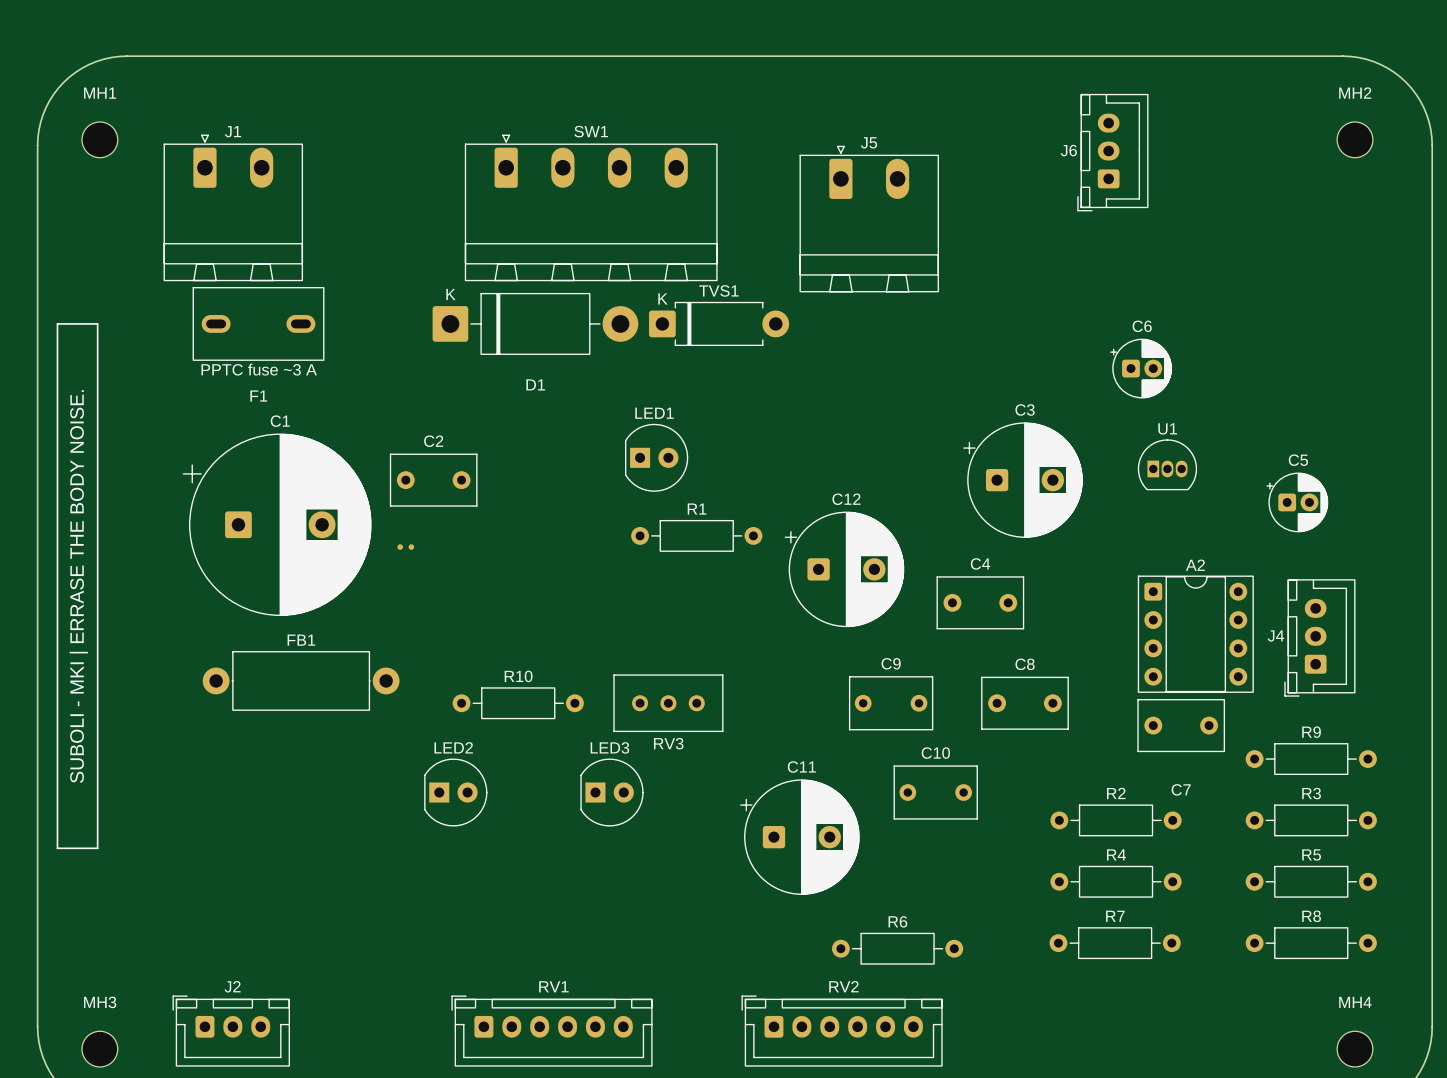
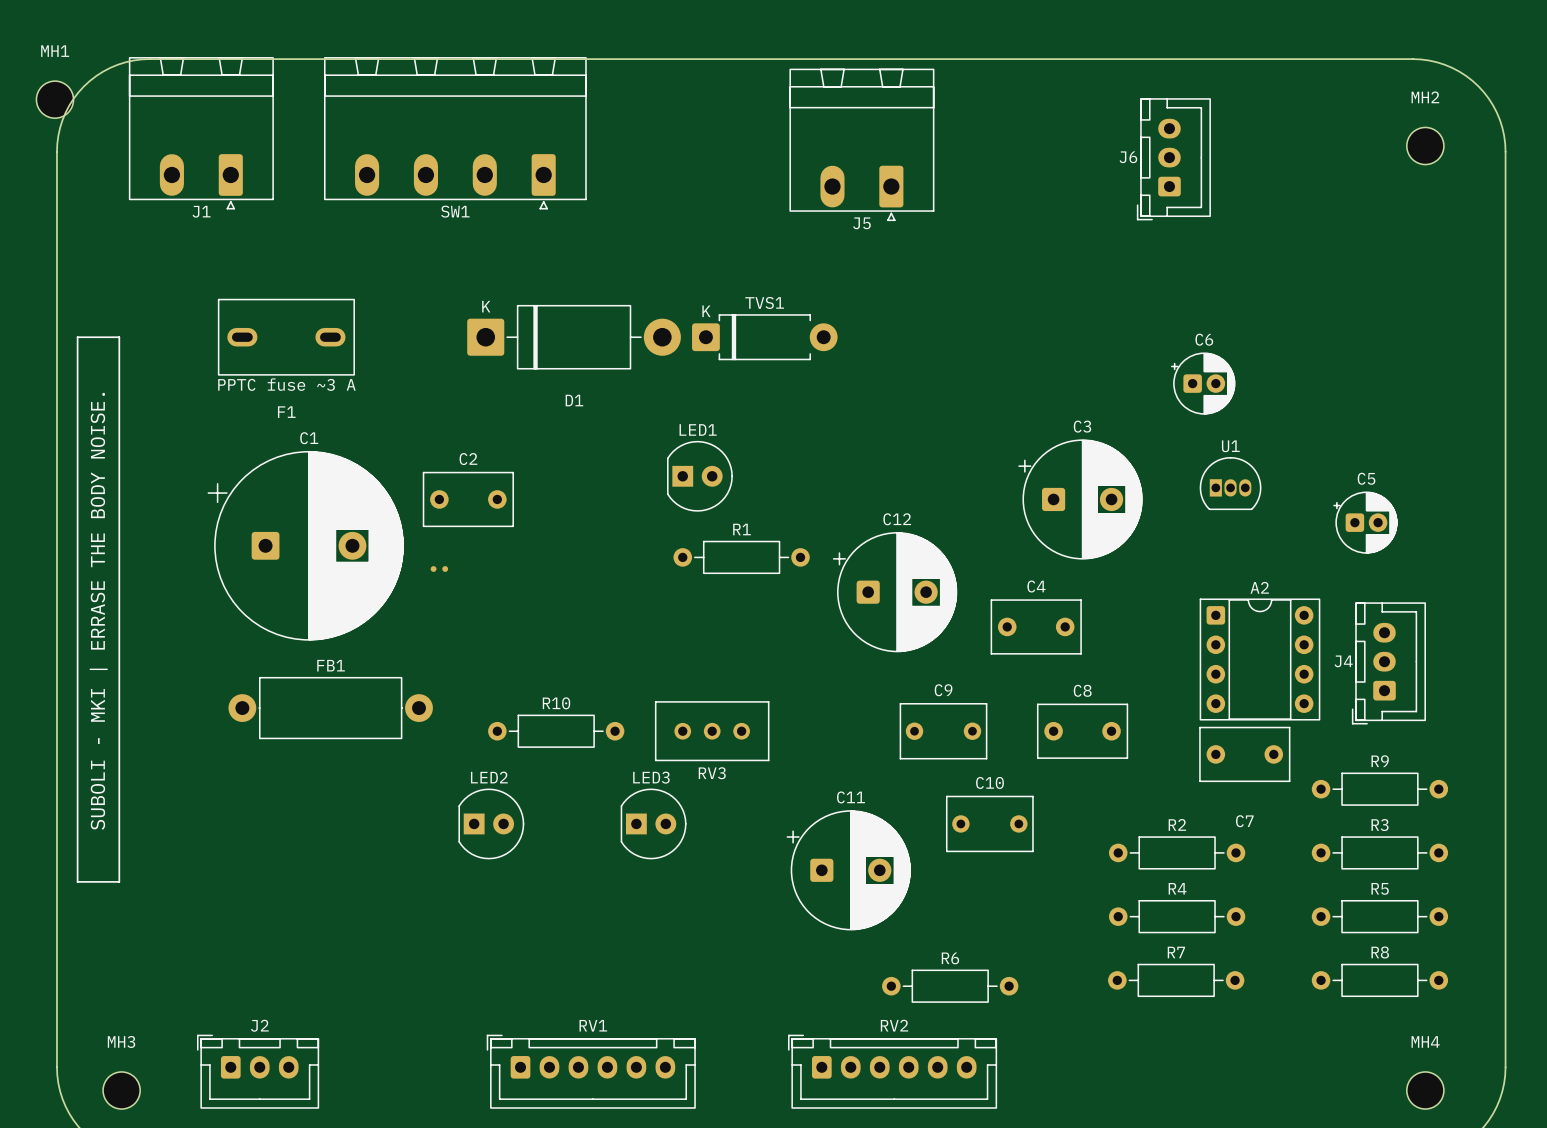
MH1 position: (99, 139) -> (54, 99)
J1 rotation: 0° (233, 207) -> 180° (201, 133)
J1 position: (233, 207) -> (201, 133)
SW1 rotation: 0° (591, 207) -> 180° (455, 133)
SW1 position: (591, 207) -> (455, 133)
J5 rotation: 0° (869, 219) -> 180° (861, 144)
J5 position: (869, 219) -> (861, 144)

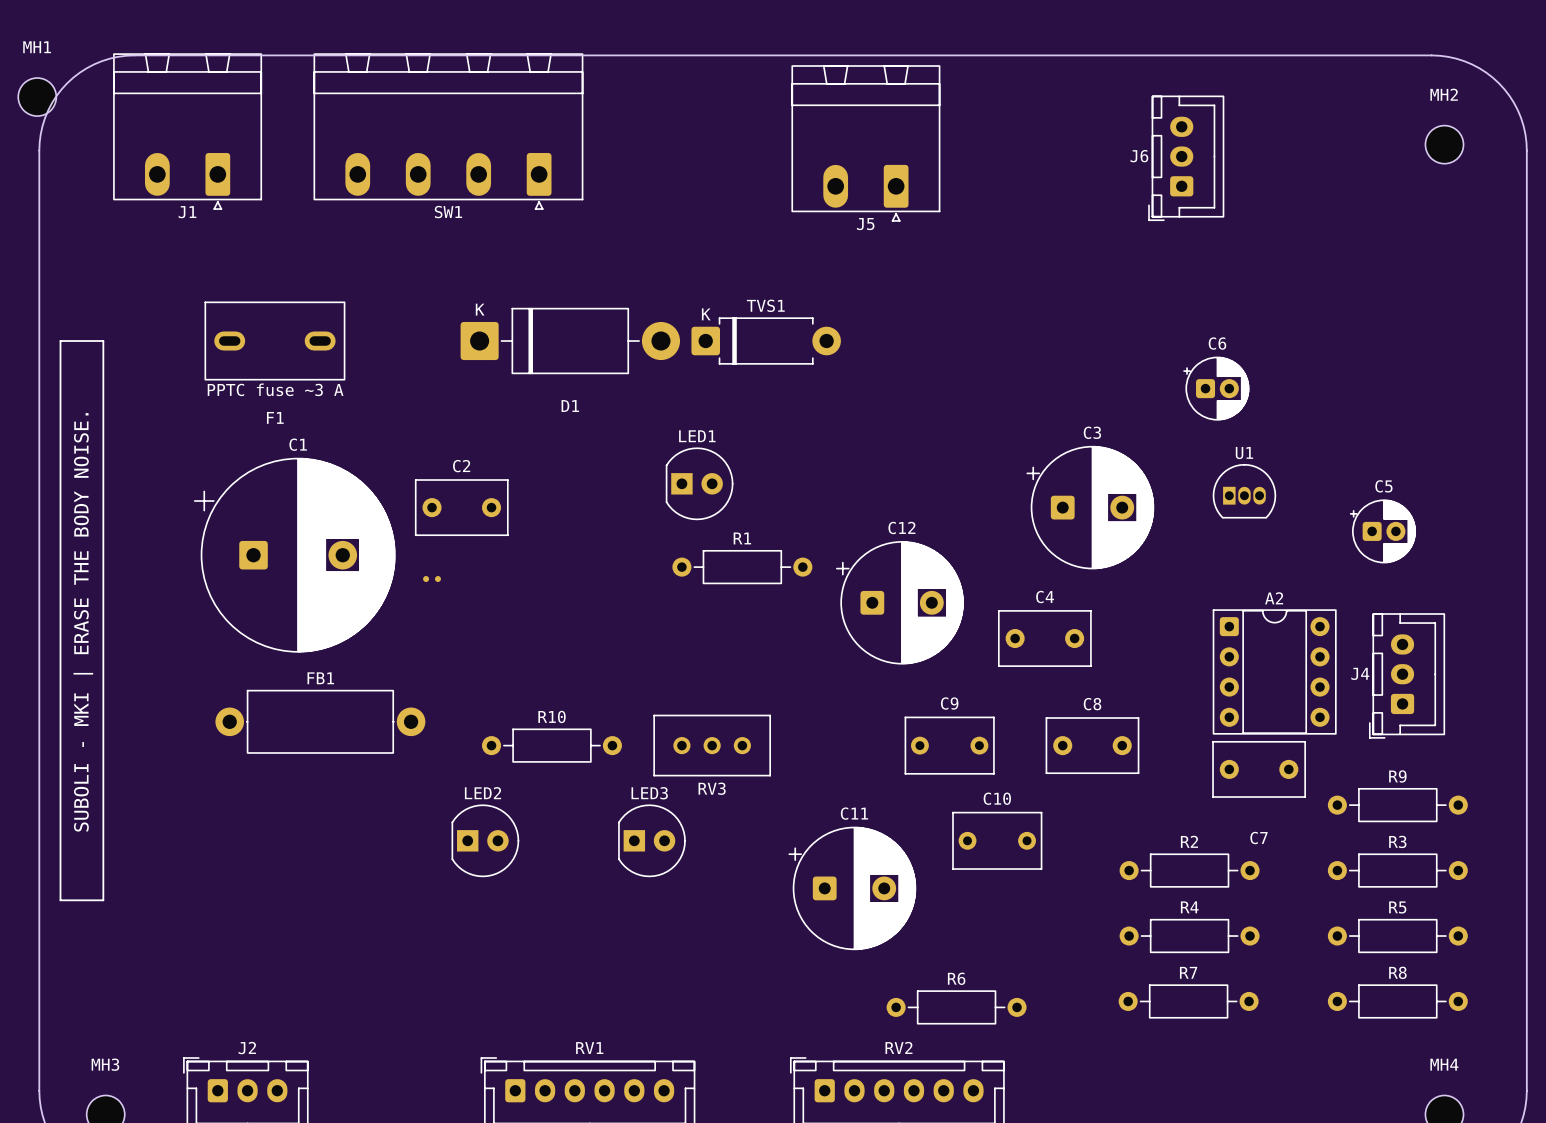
text: SUBOLI - MKI | ERRASE THE BODY NOISE. (98, 611) -> SUBOLI - MKI | ERASE THE BODY NOISE. (83, 622)

